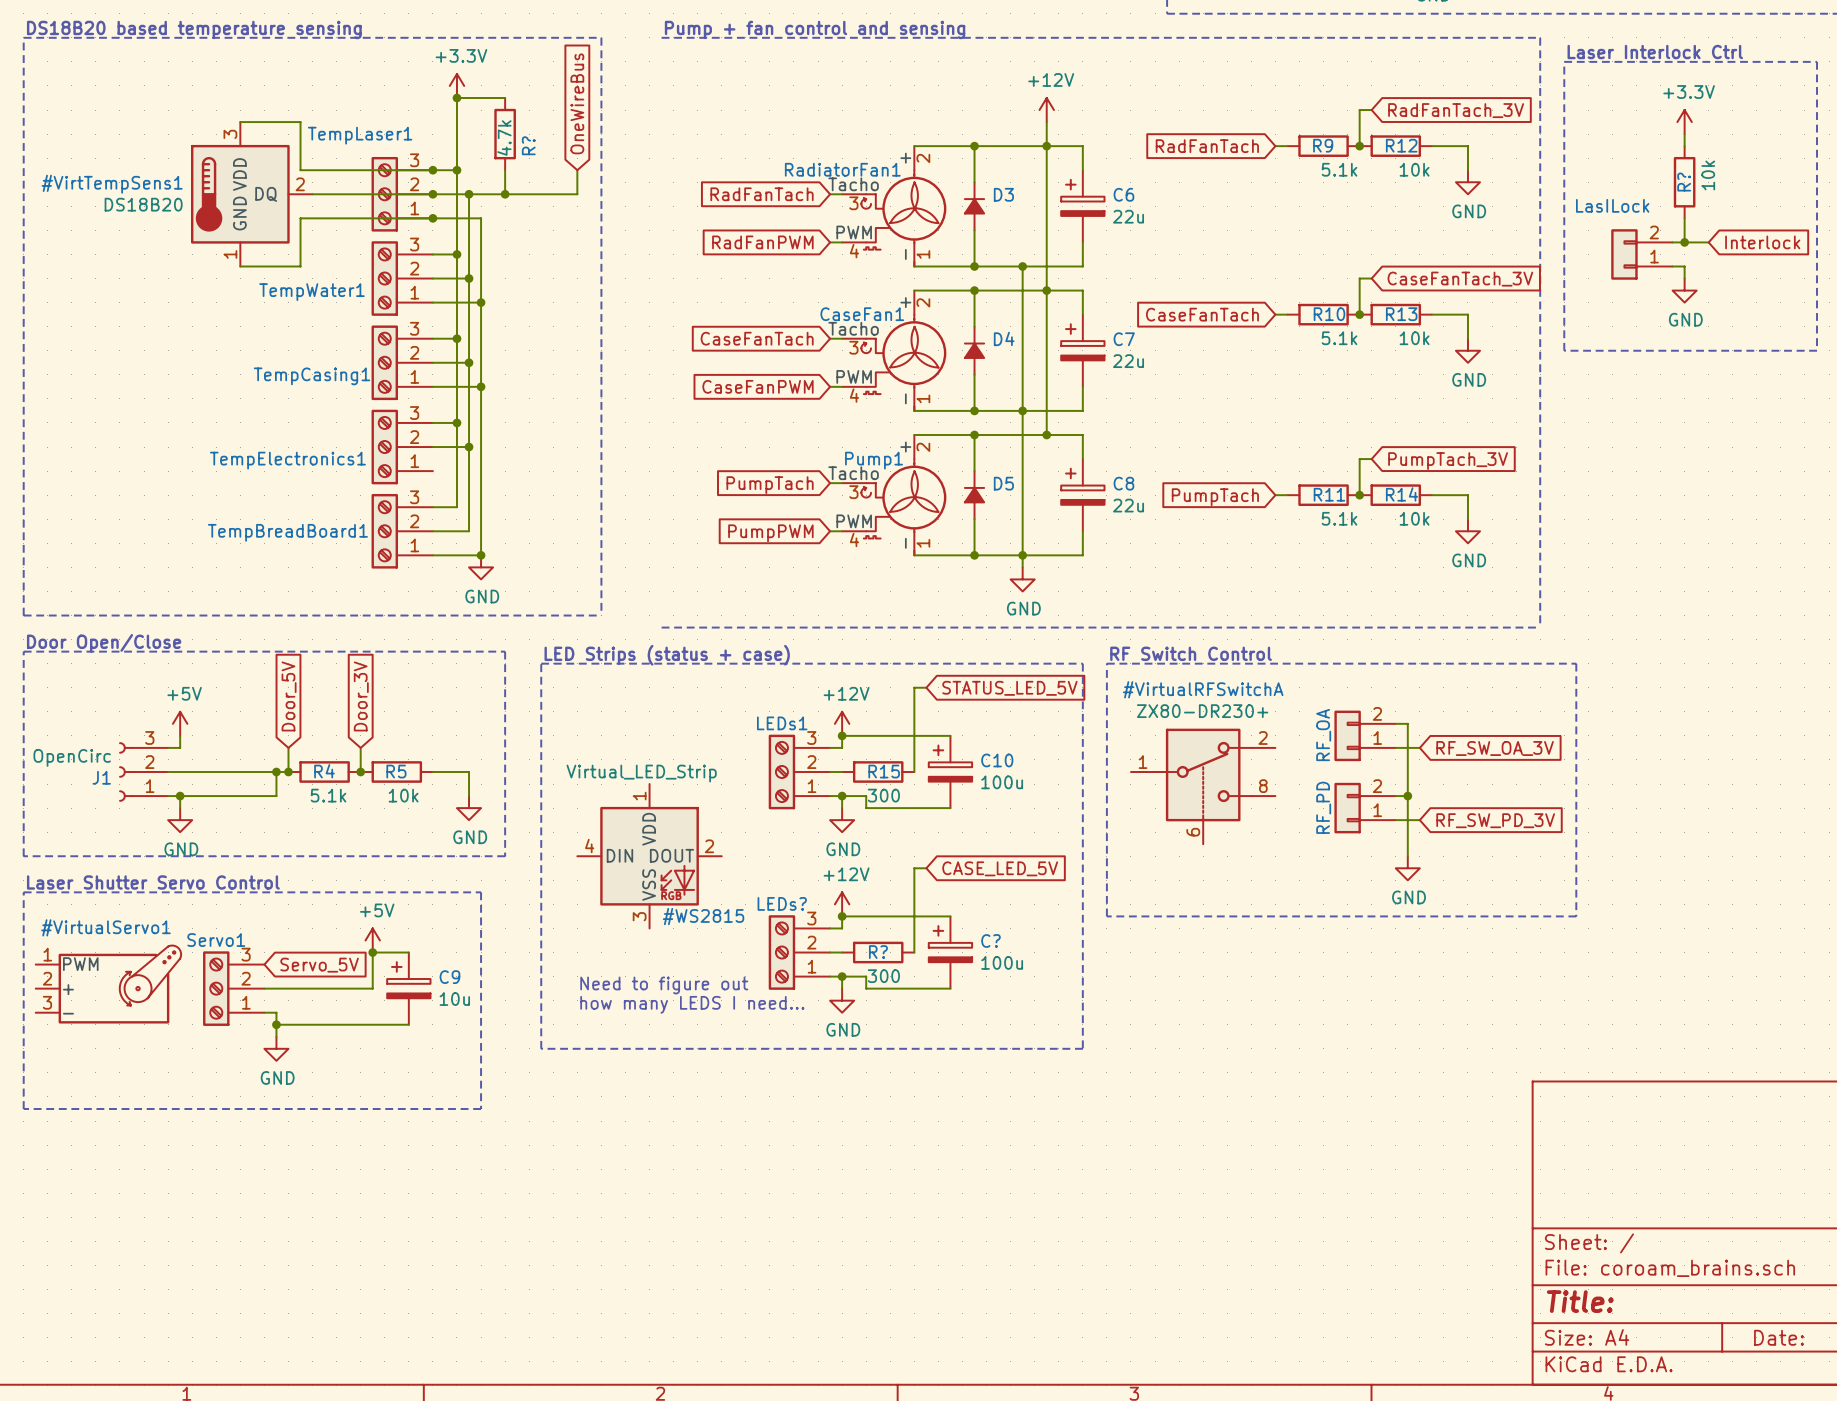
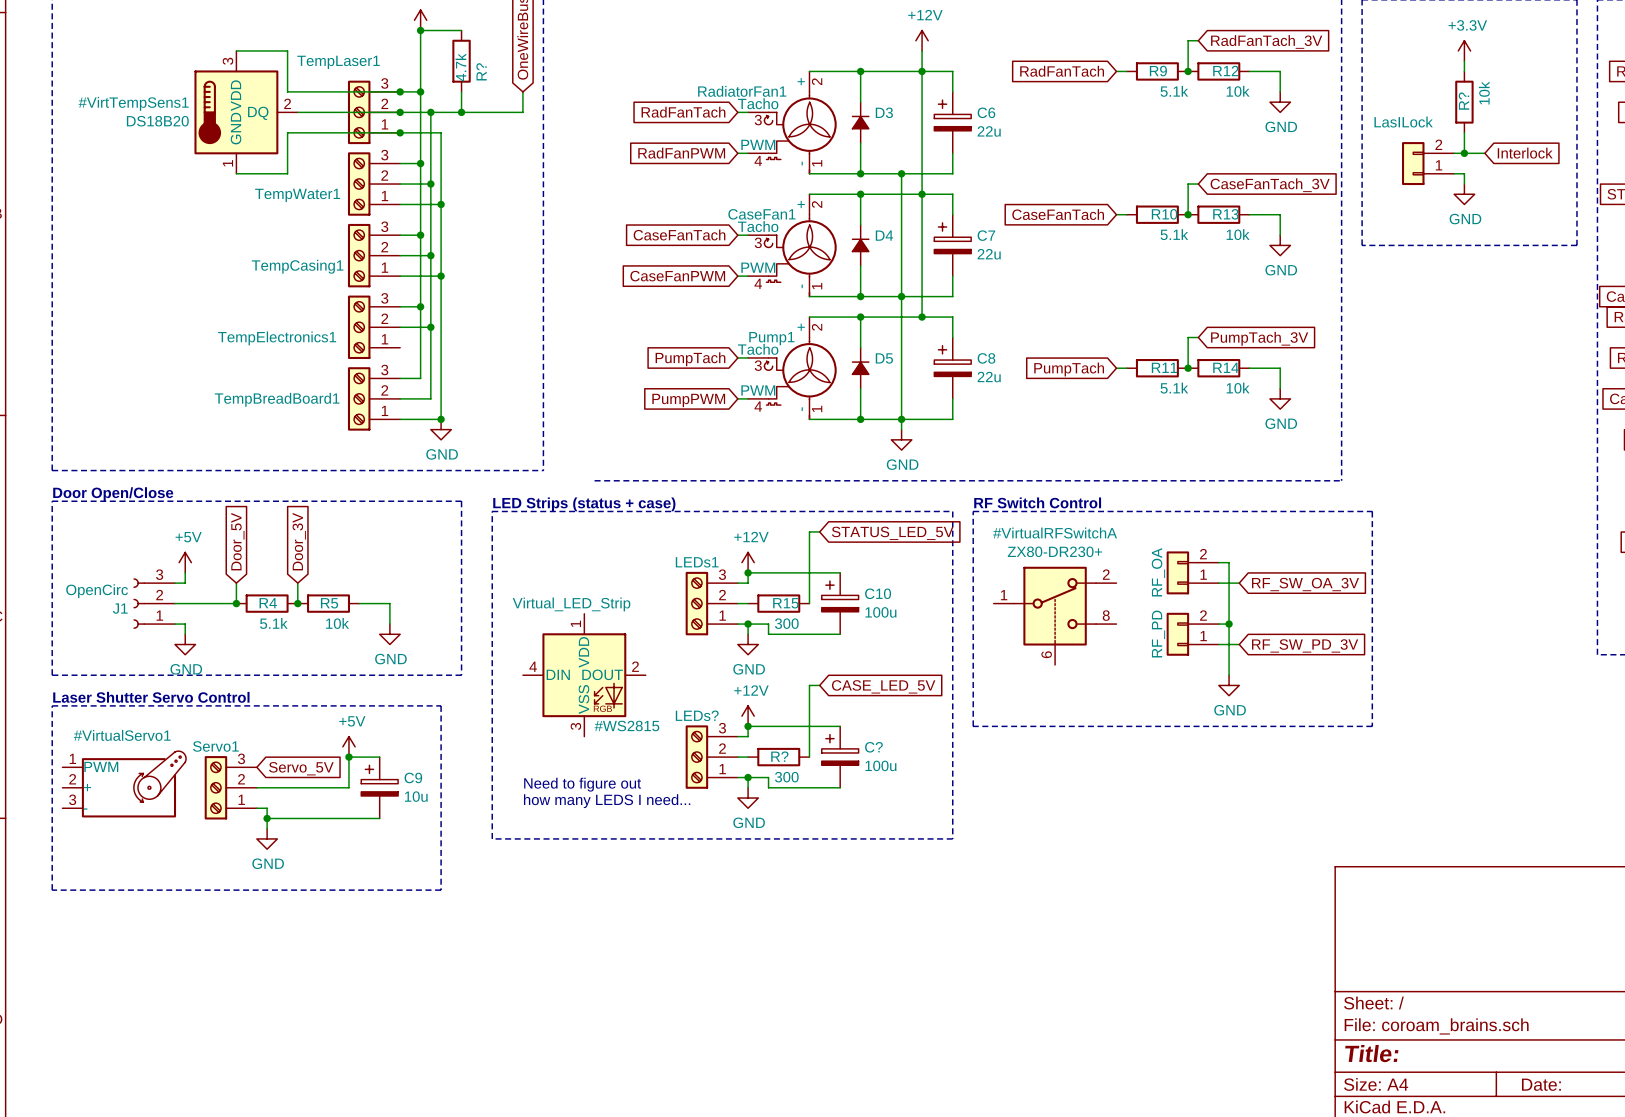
global label position: Door_5V (289, 696) -> Door_5V (237, 541)
global label position: Door_3V (361, 696) -> Door_3V (299, 541)
wire: (288, 747) (288, 771) (240, 771) -> (236, 583) (236, 603)
wire: (360, 747) (360, 771) -> (297, 583) (297, 603)
junction: none -> (236, 603)
wire: (276, 771) (276, 796) (180, 796) -> none
junction: (276, 771) -> none
junction: (288, 771) -> none
junction: none -> (297, 603)
R4 position: (324, 771) -> (267, 603)
junction: (360, 771) -> none
R5 position: (396, 771) -> (328, 603)
wire: (432, 771) (469, 771) (469, 796) -> (359, 603) (389, 603) (389, 624)
junction: (180, 796) -> none
power symbol position: GND (469, 808) -> GND (389, 634)

